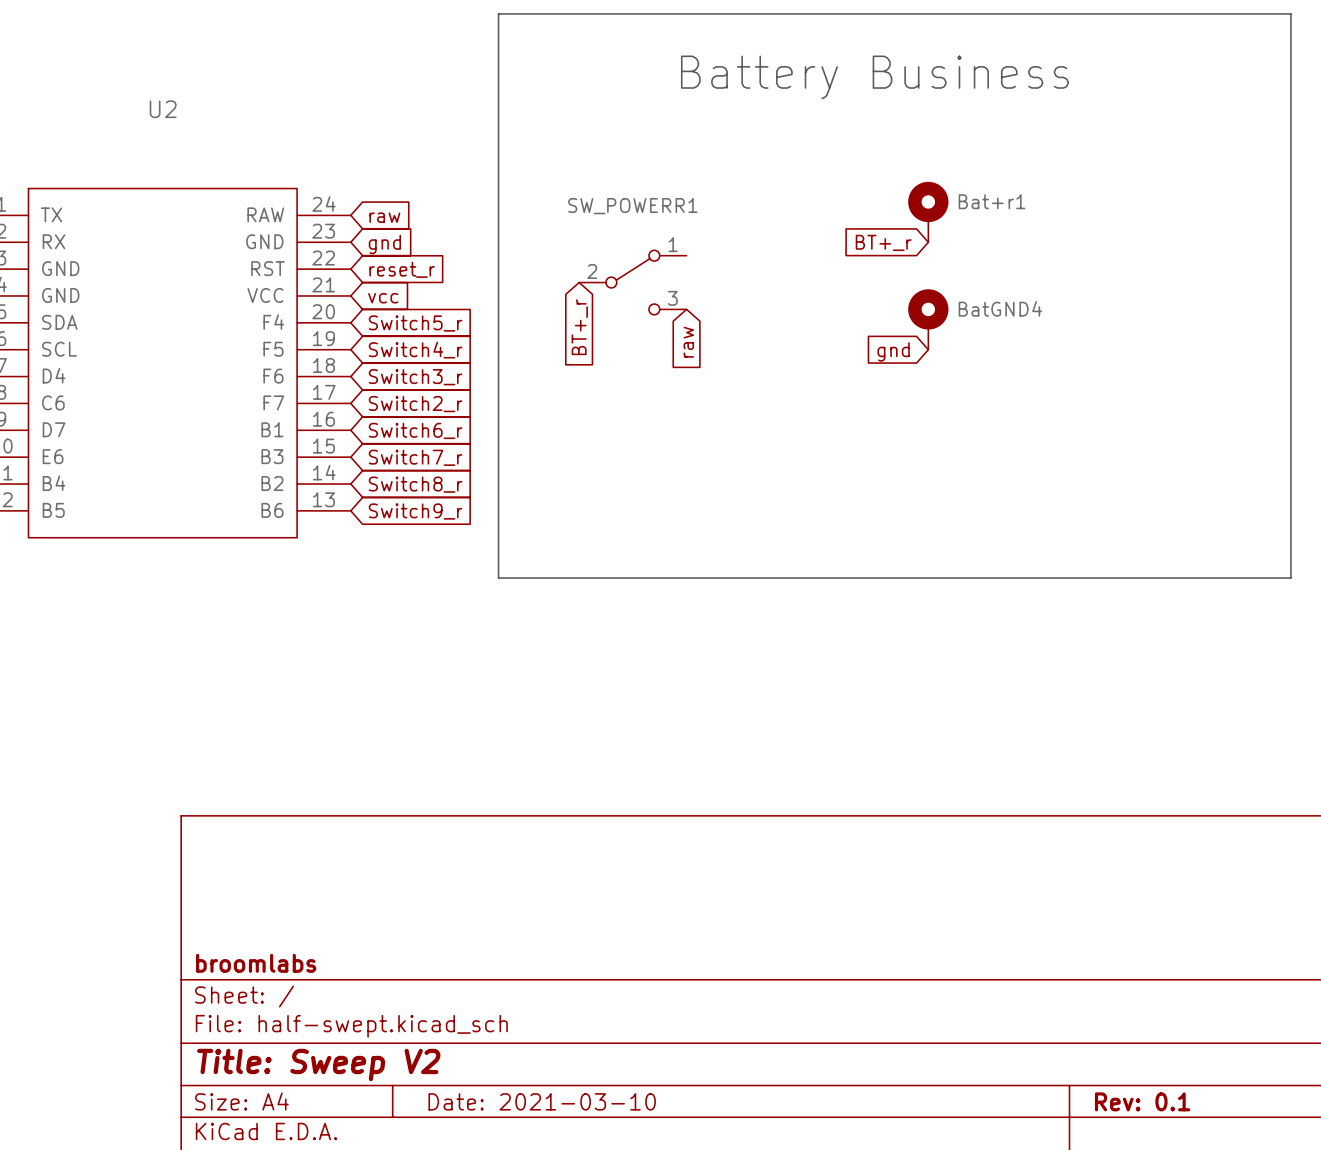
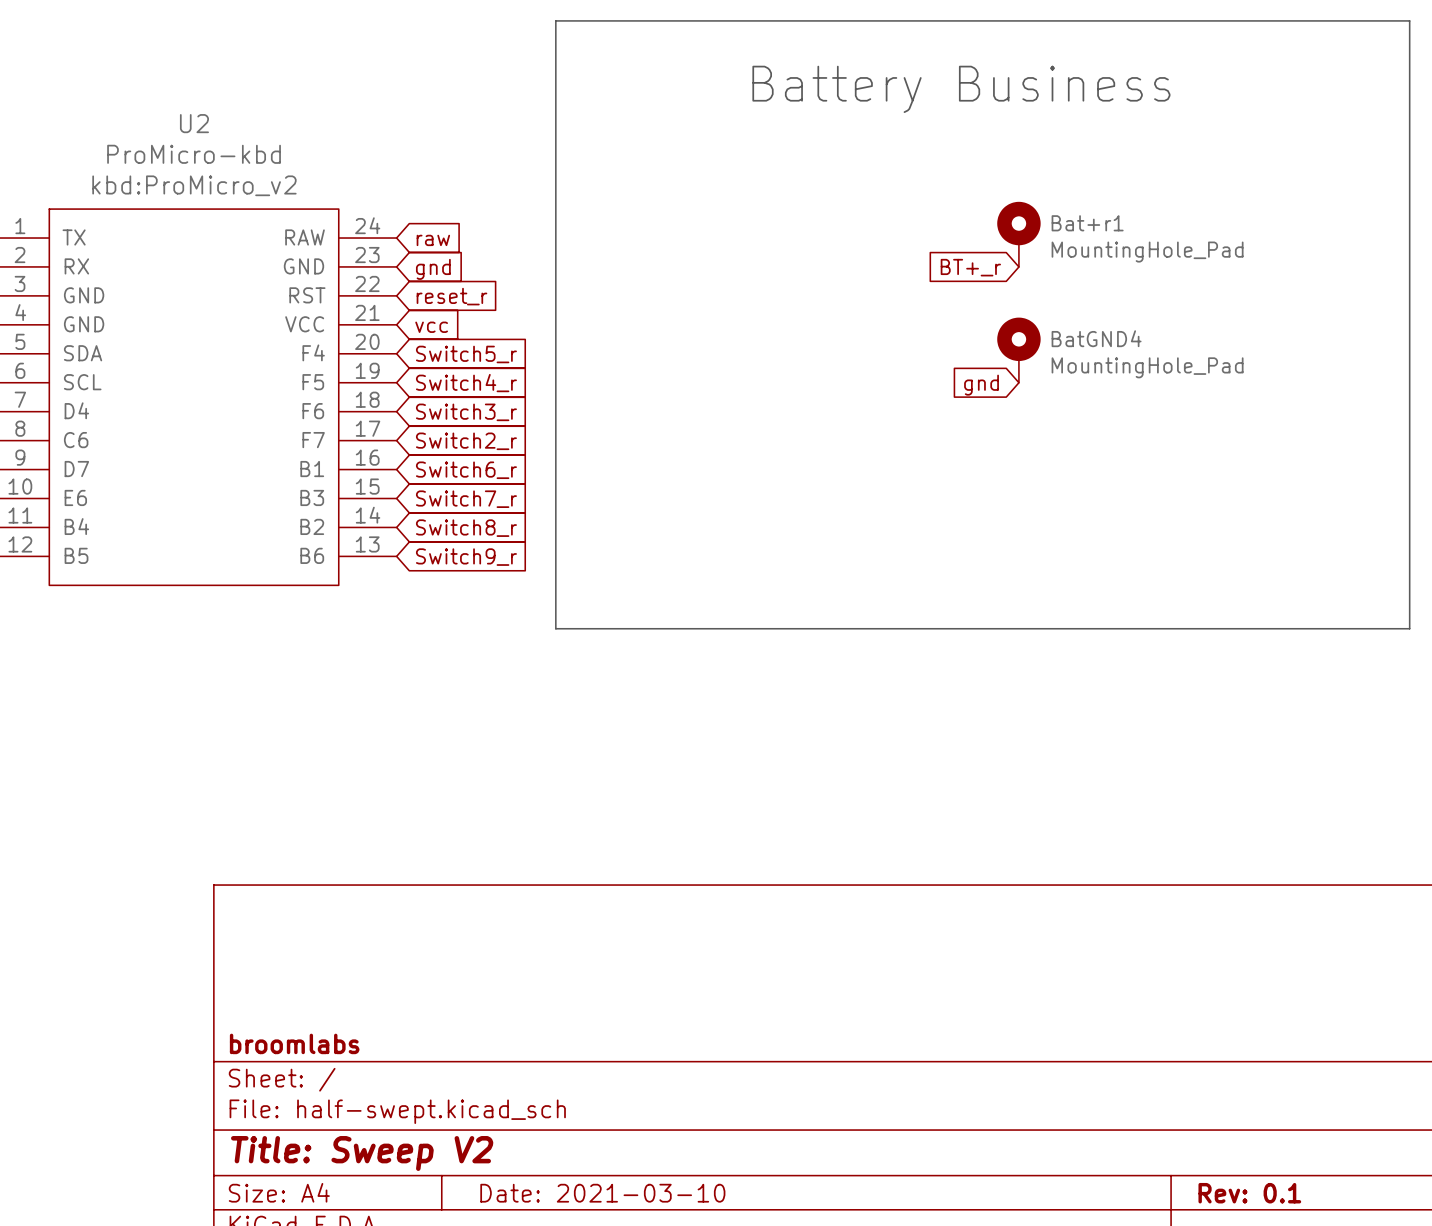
U2 value: none -> ProMicro-kbd (194, 154)
U2 text: none -> kbd:ProMicro_v2 (194, 185)
Bat+r1 value: none -> MountingHole_Pad (1147, 252)
SW_POWERR1: (632, 282) -> none
global label: BT+_r (579, 327) -> none
BatGND4 value: none -> MountingHole_Pad (1147, 367)
global label: raw (688, 342) -> none

